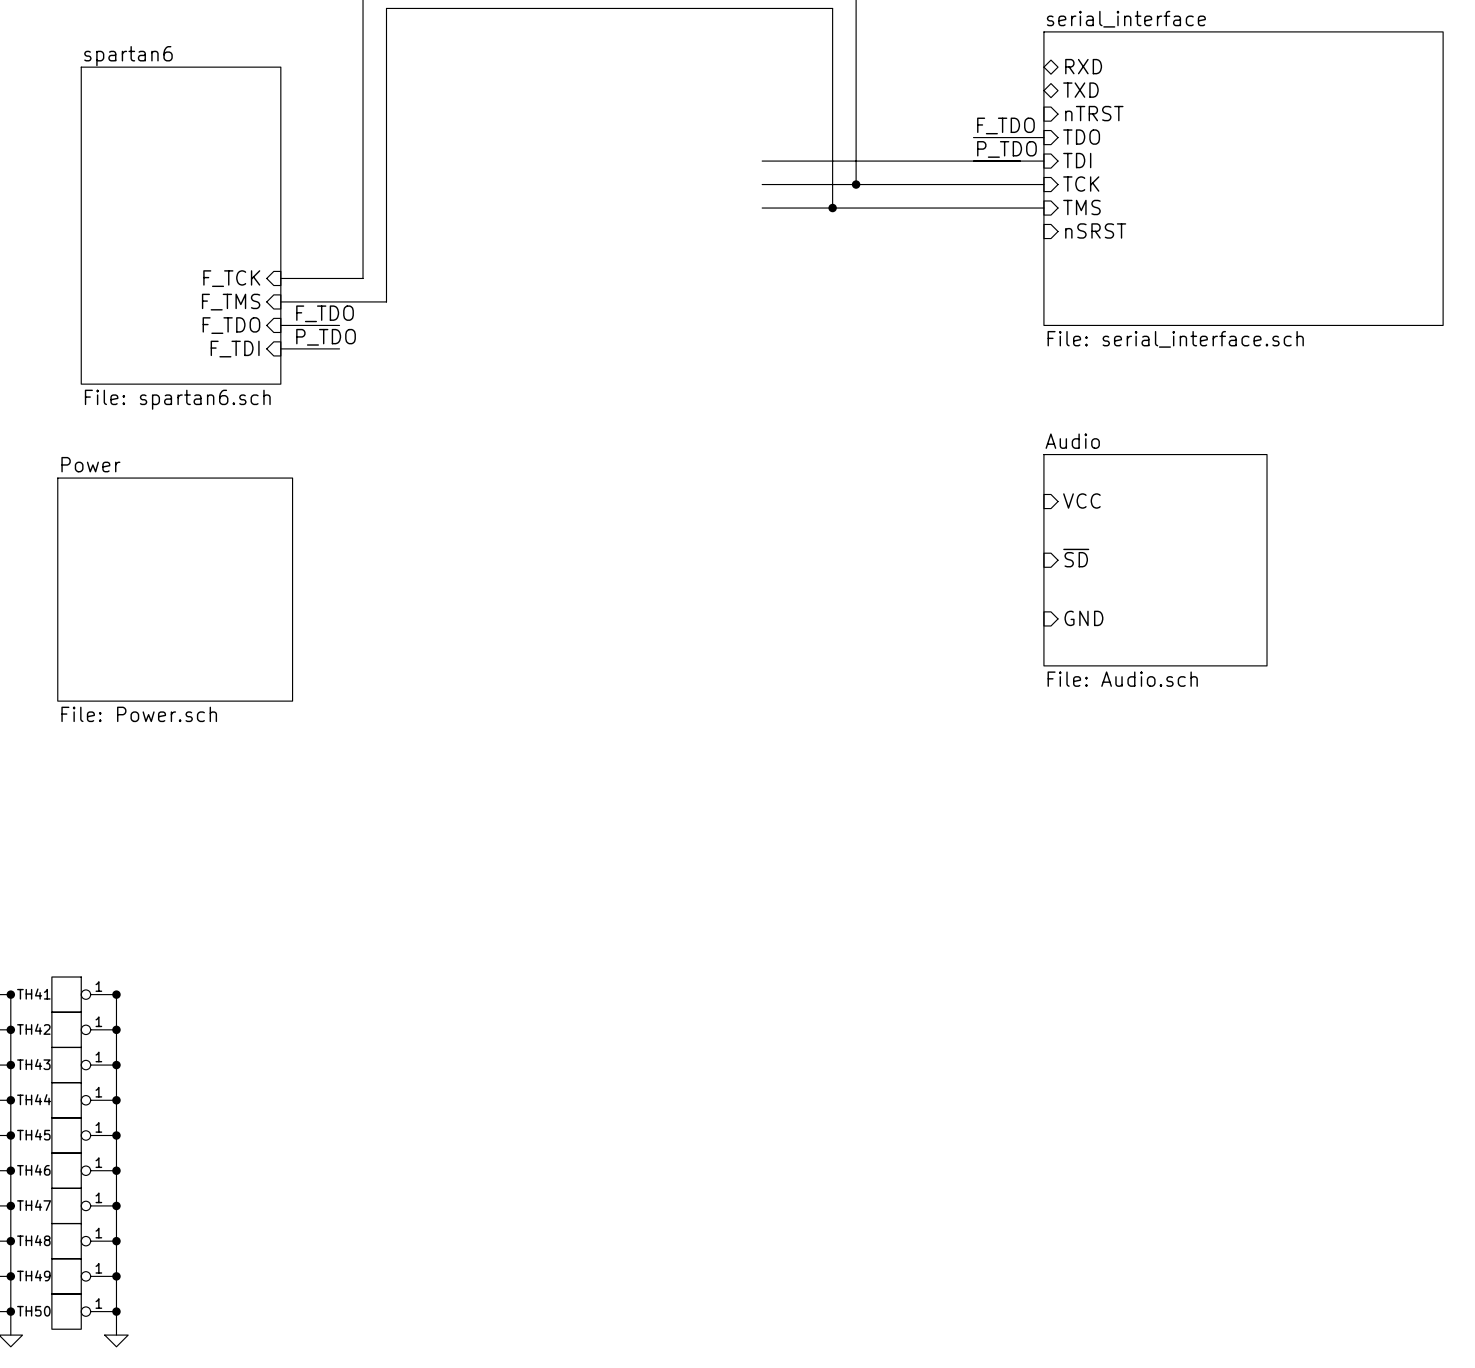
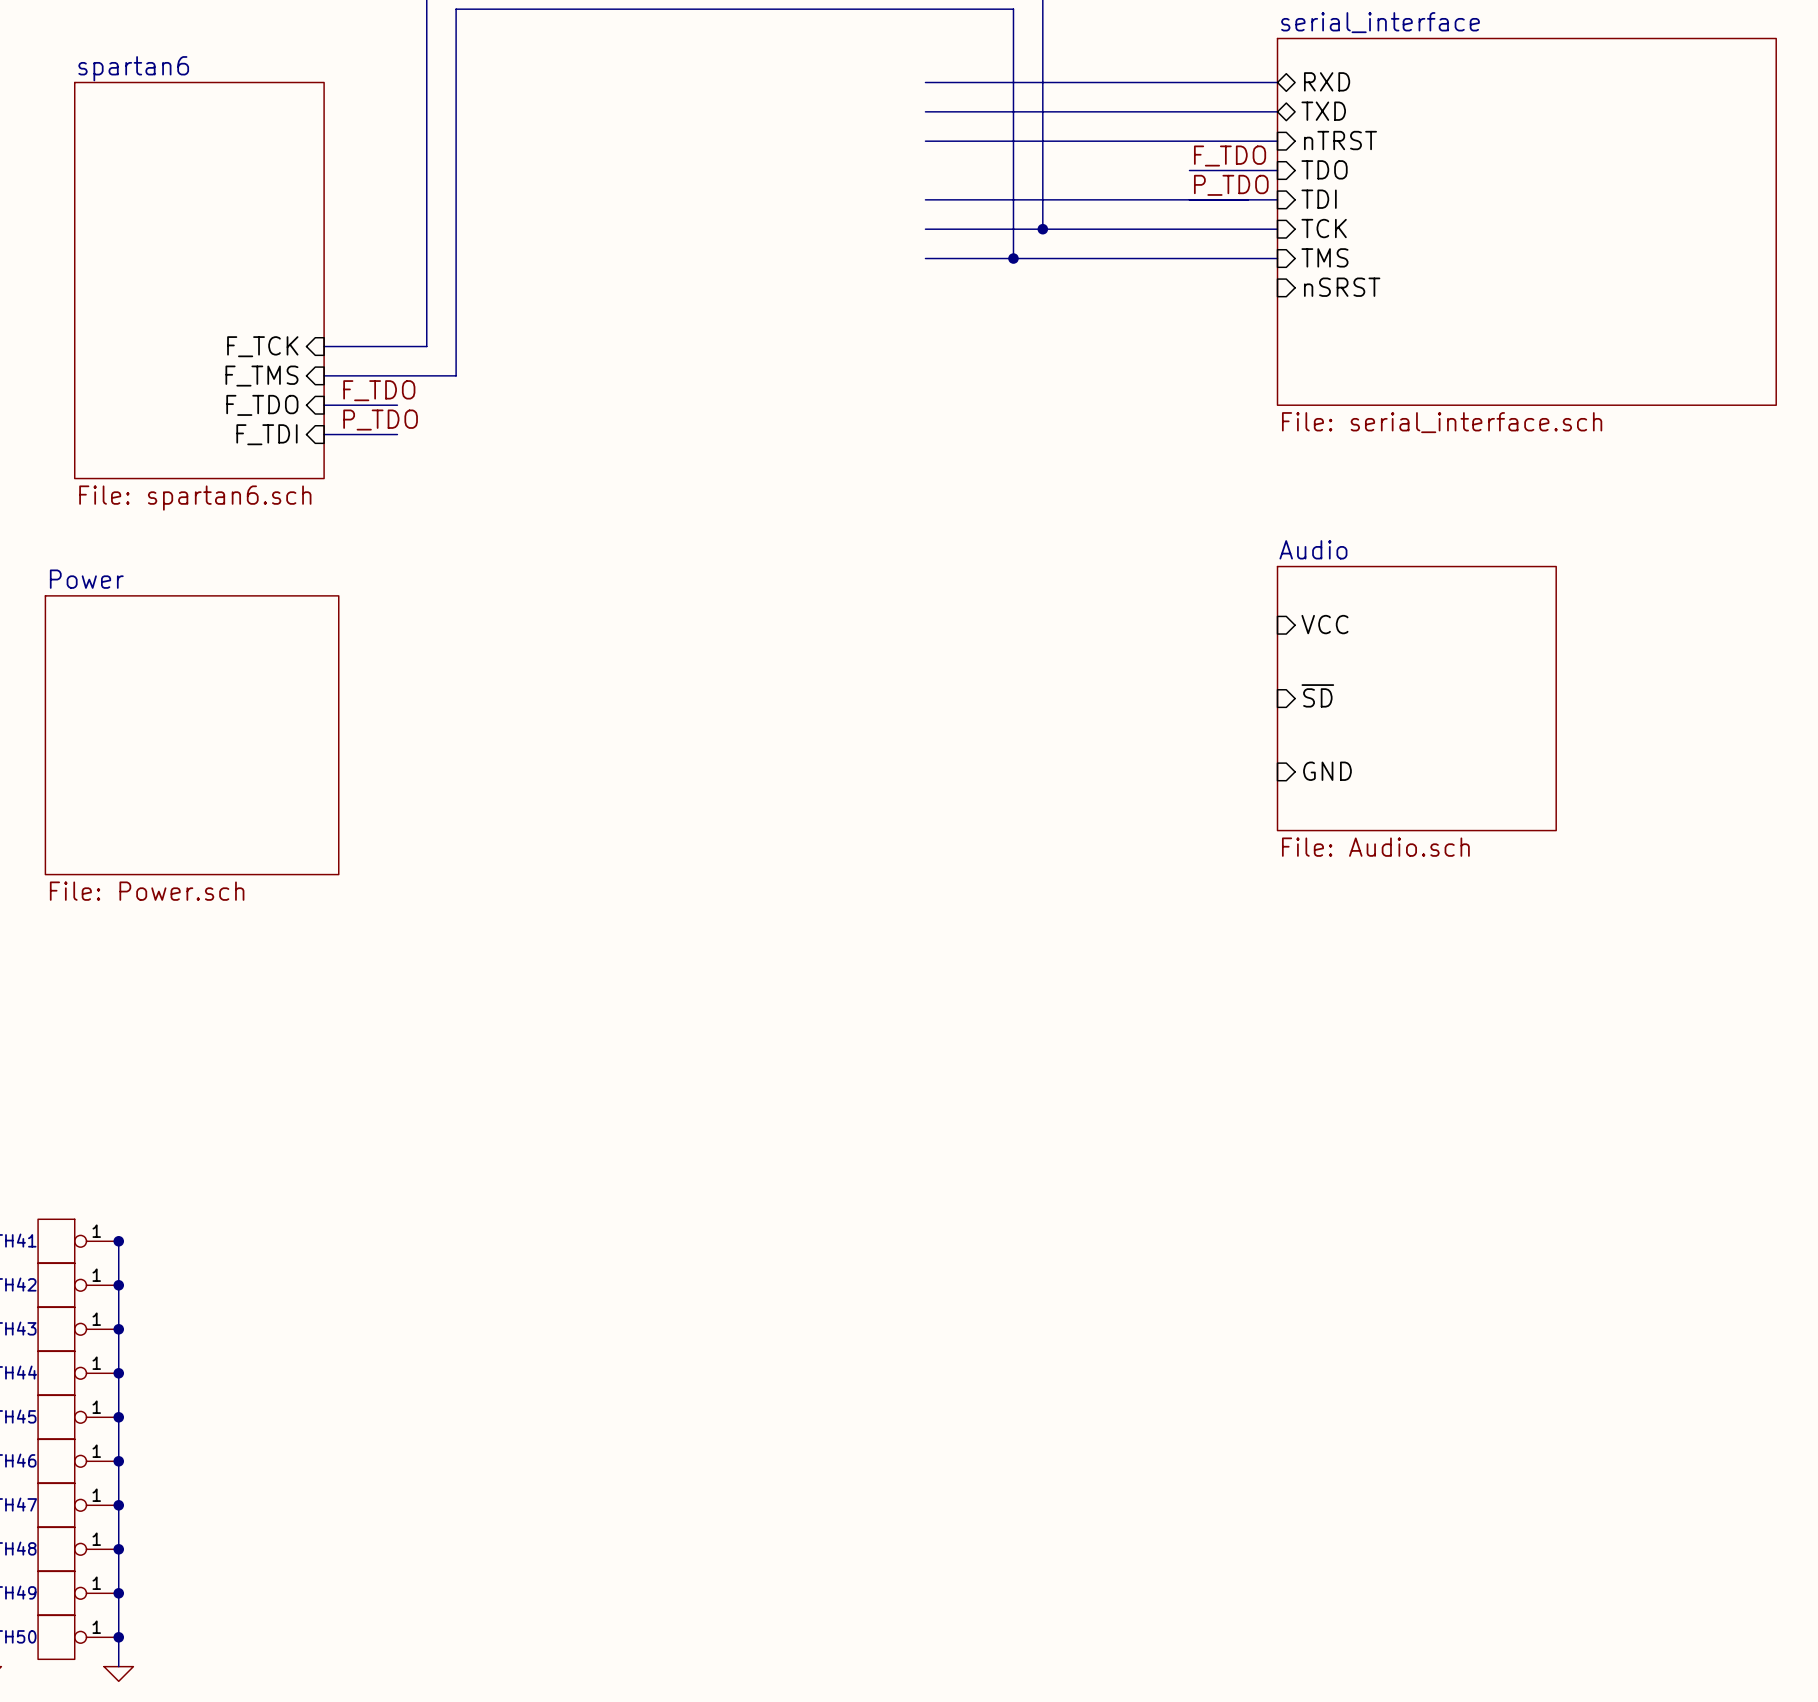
wire: none -> (925, 82) (1277, 82)
wire: none -> (925, 111) (1277, 111)
wire: none -> (925, 141) (1277, 141)

